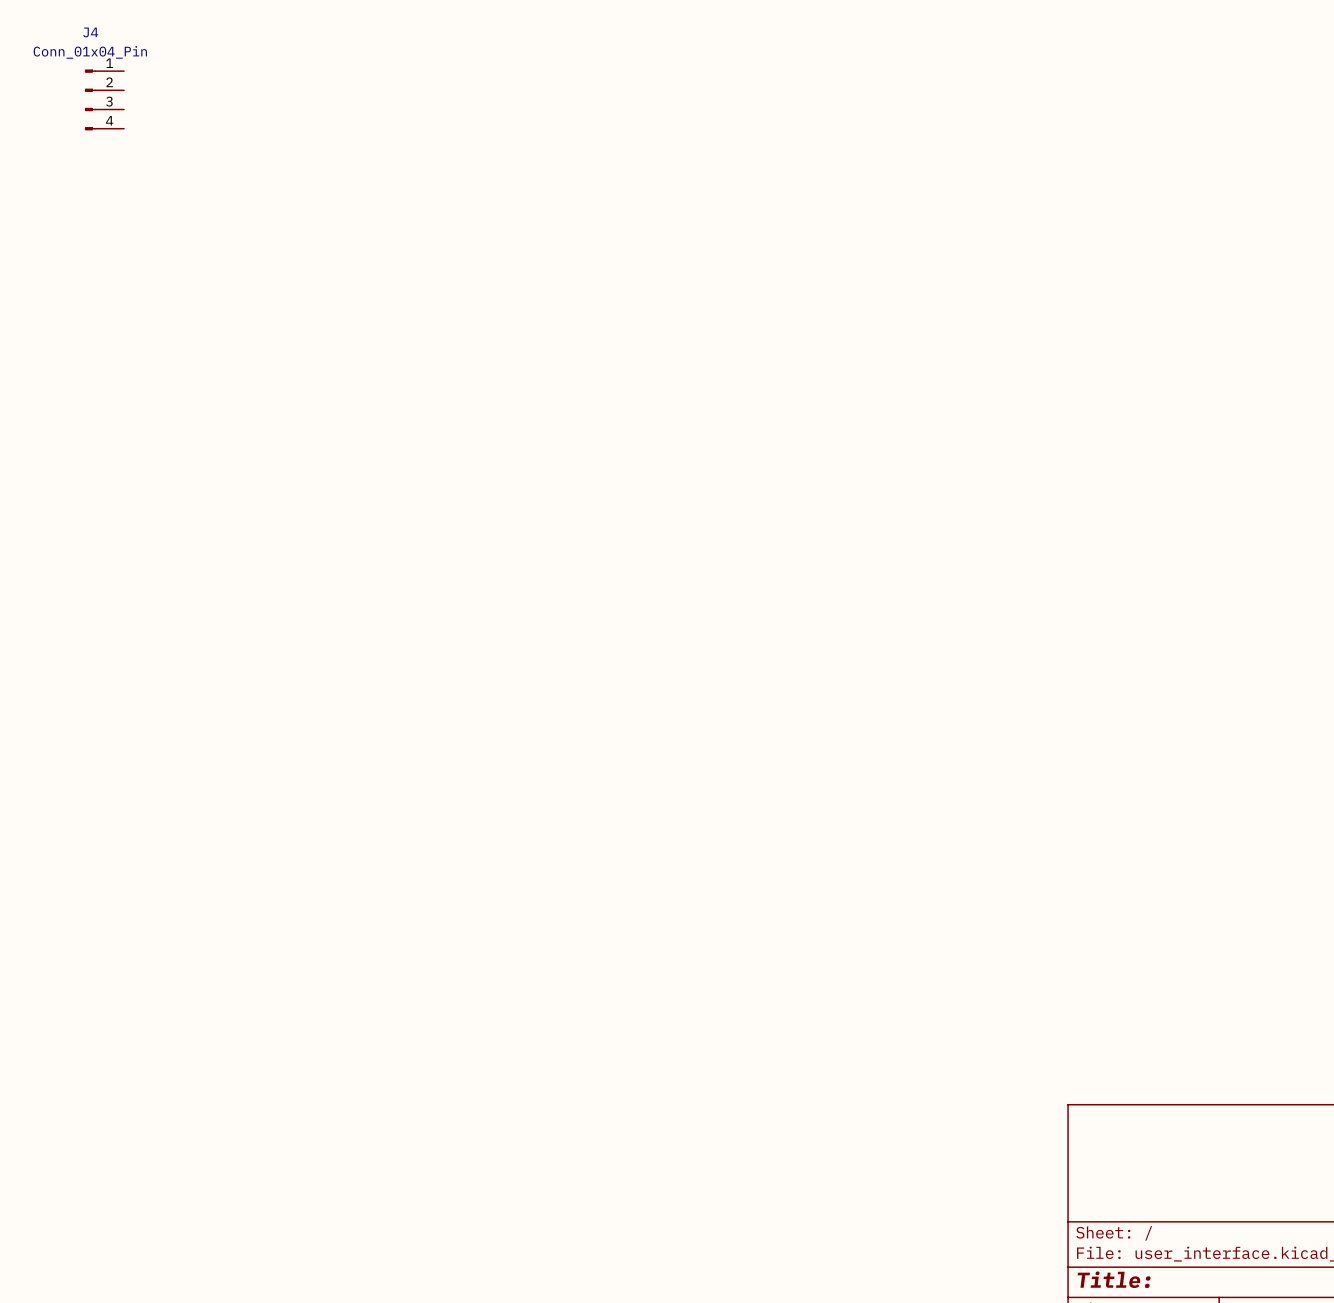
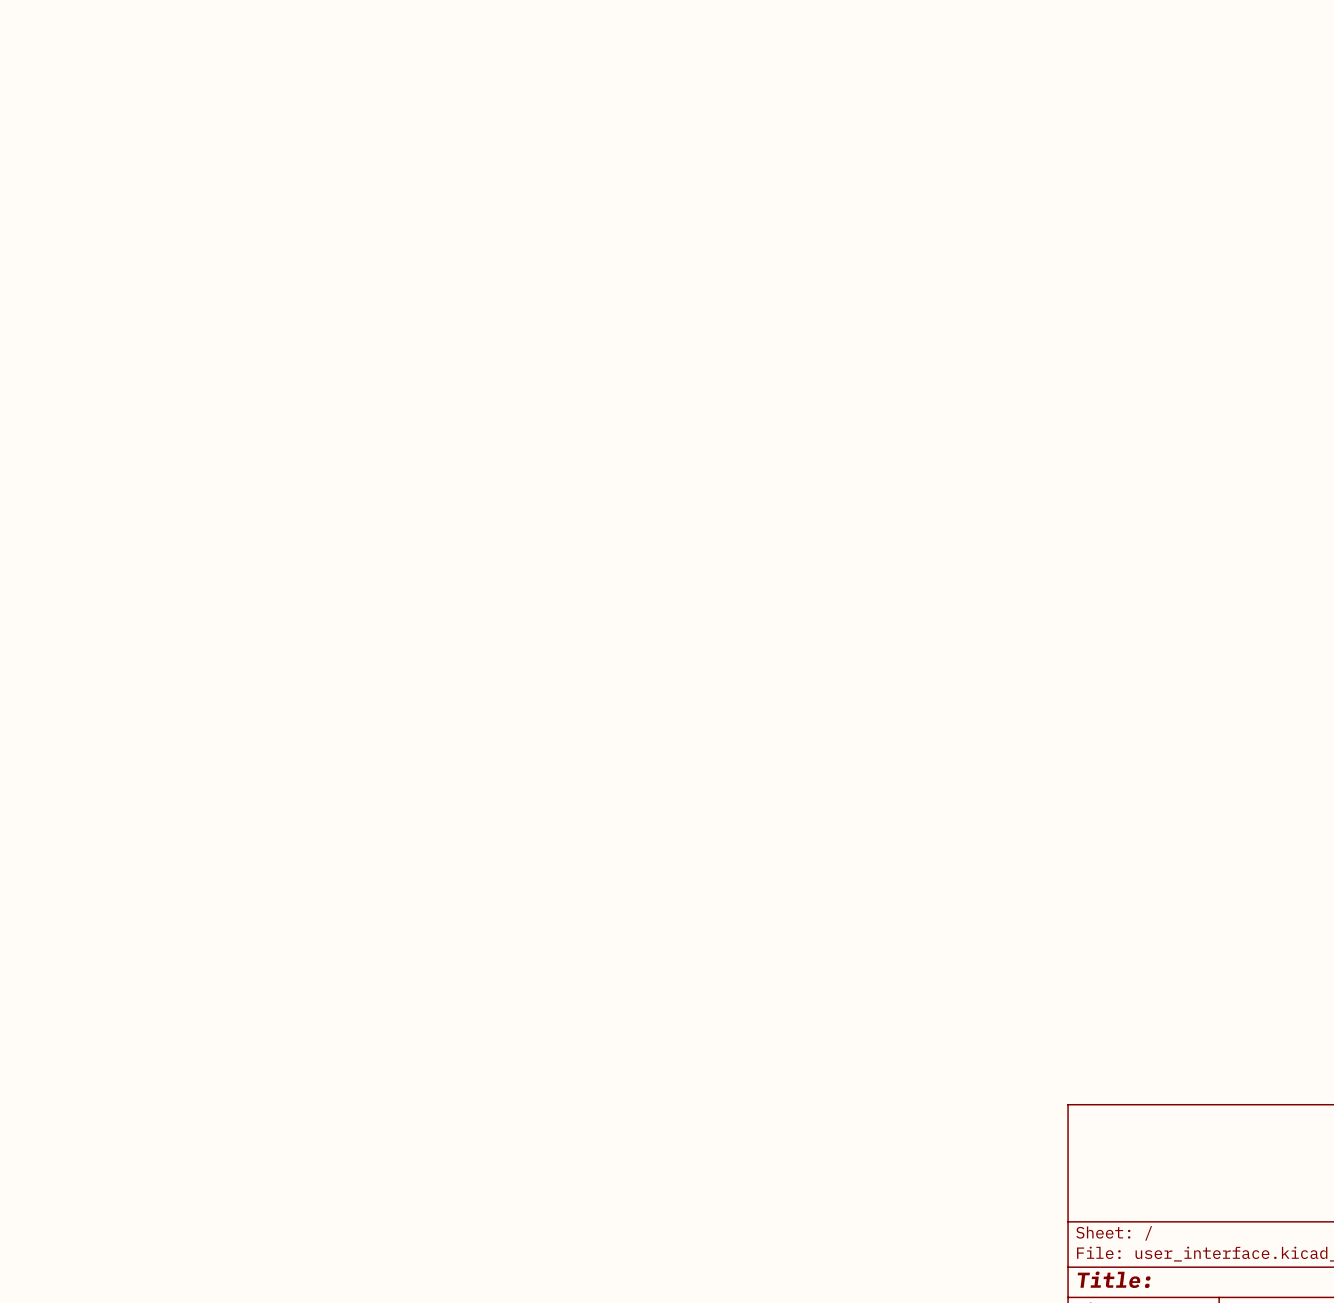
J4: Conn_01x04_Pin (104, 99) -> none

